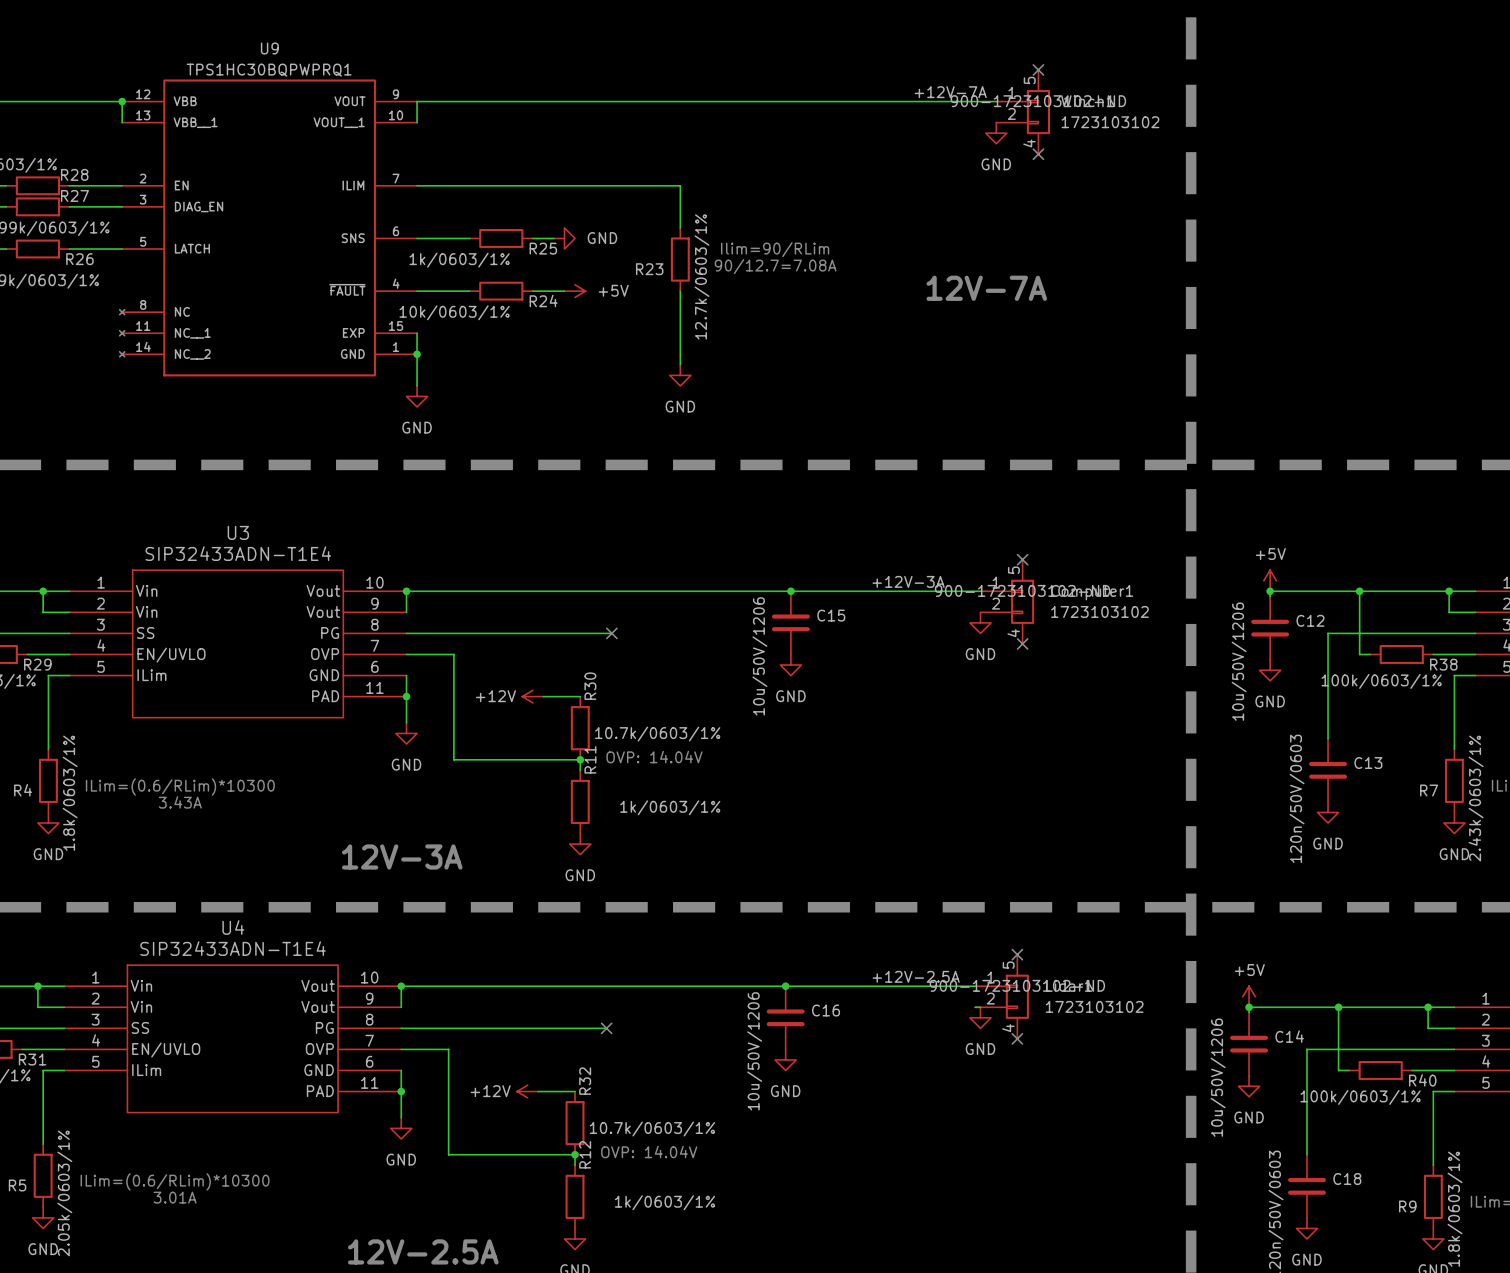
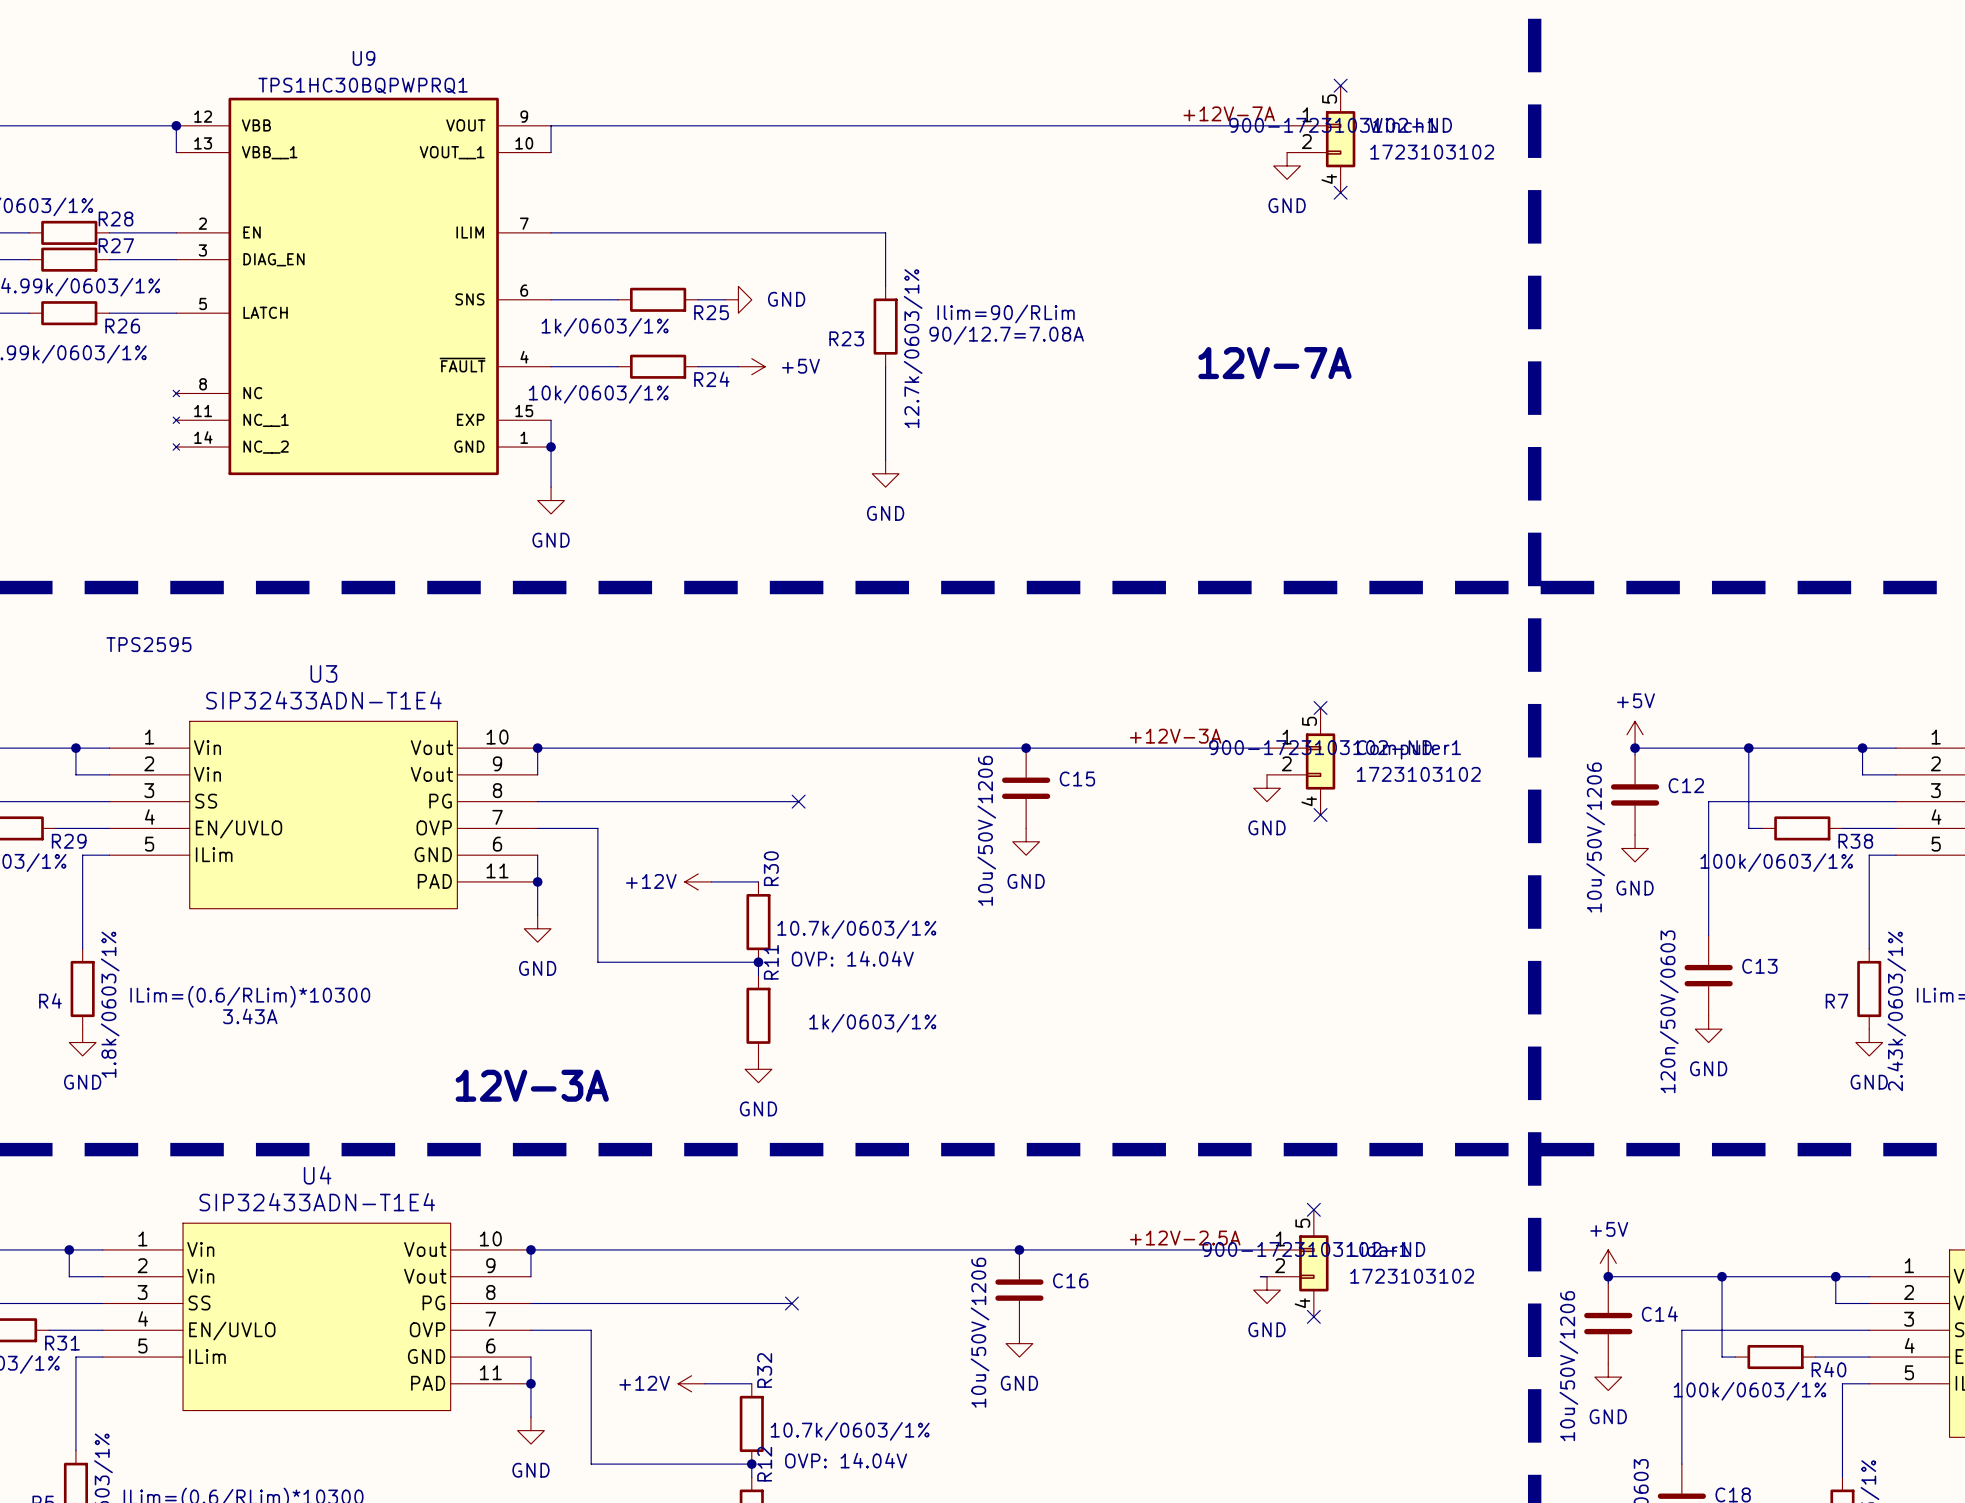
text: none -> TPS2595 (148, 644)

